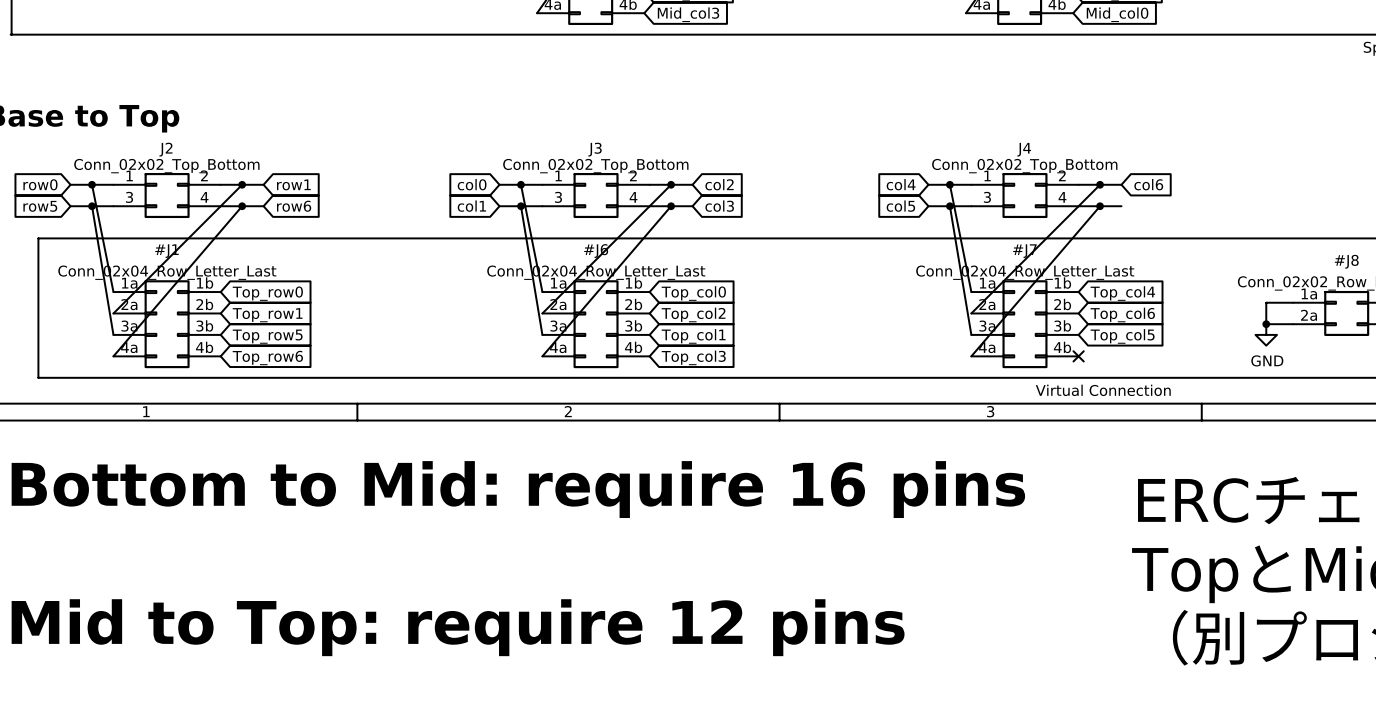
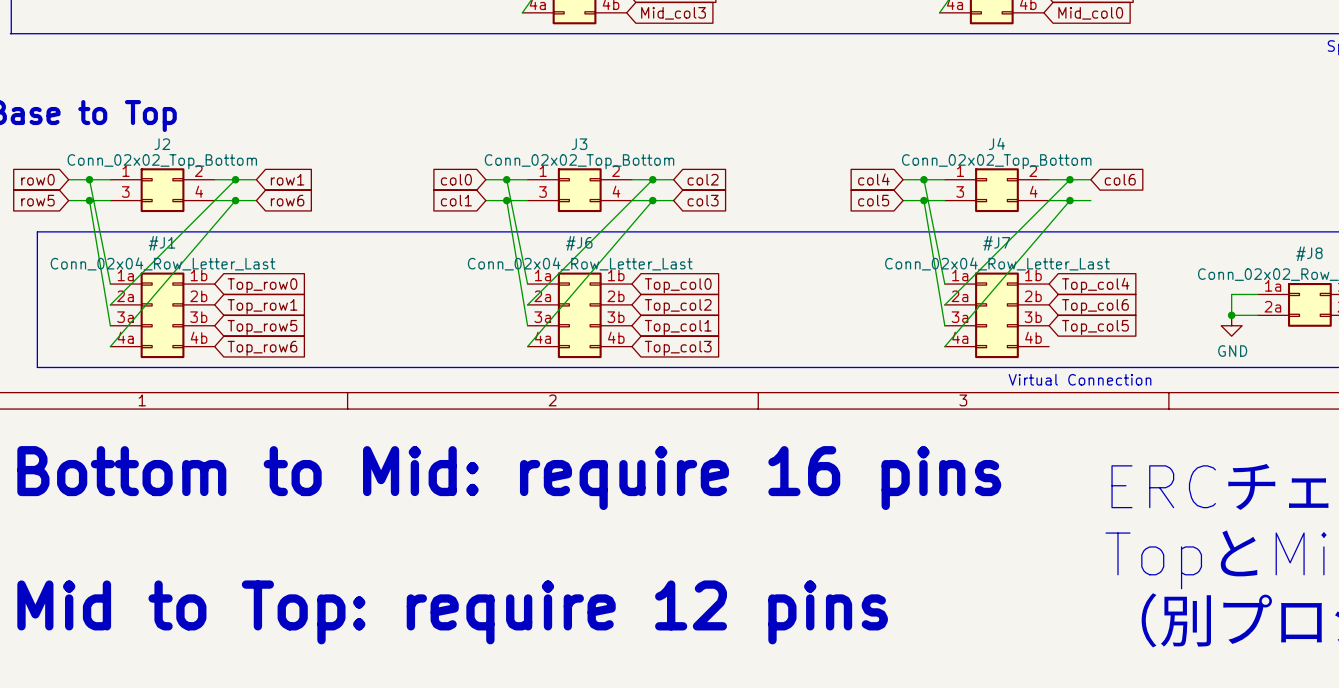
no-connect mark: (1078, 356) -> none

